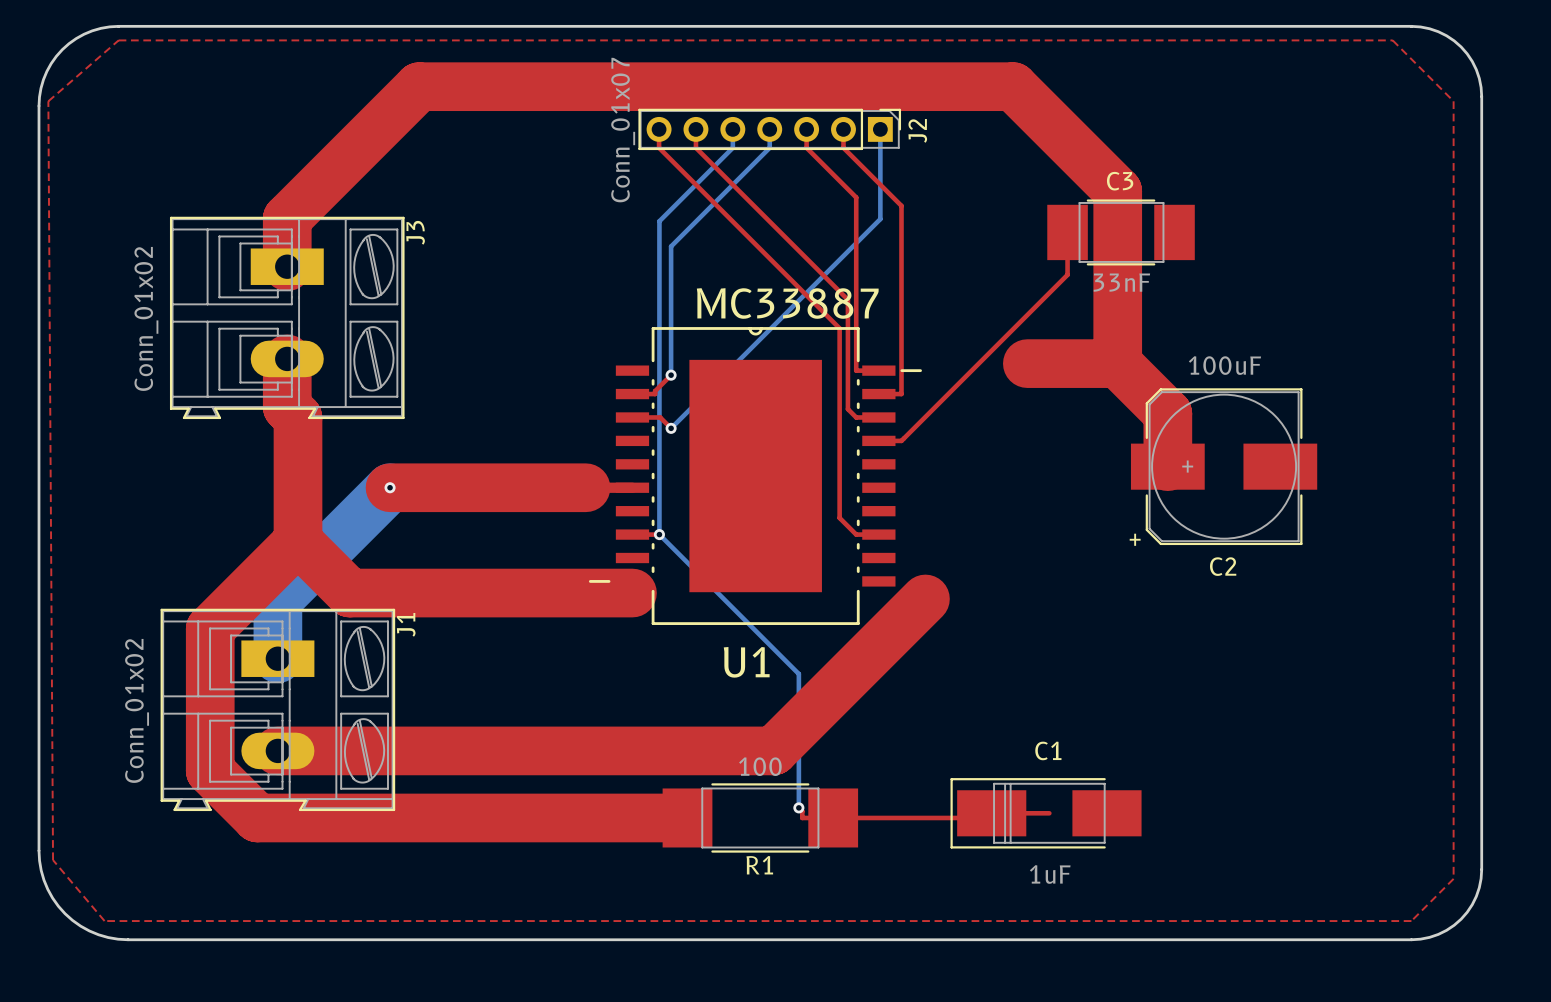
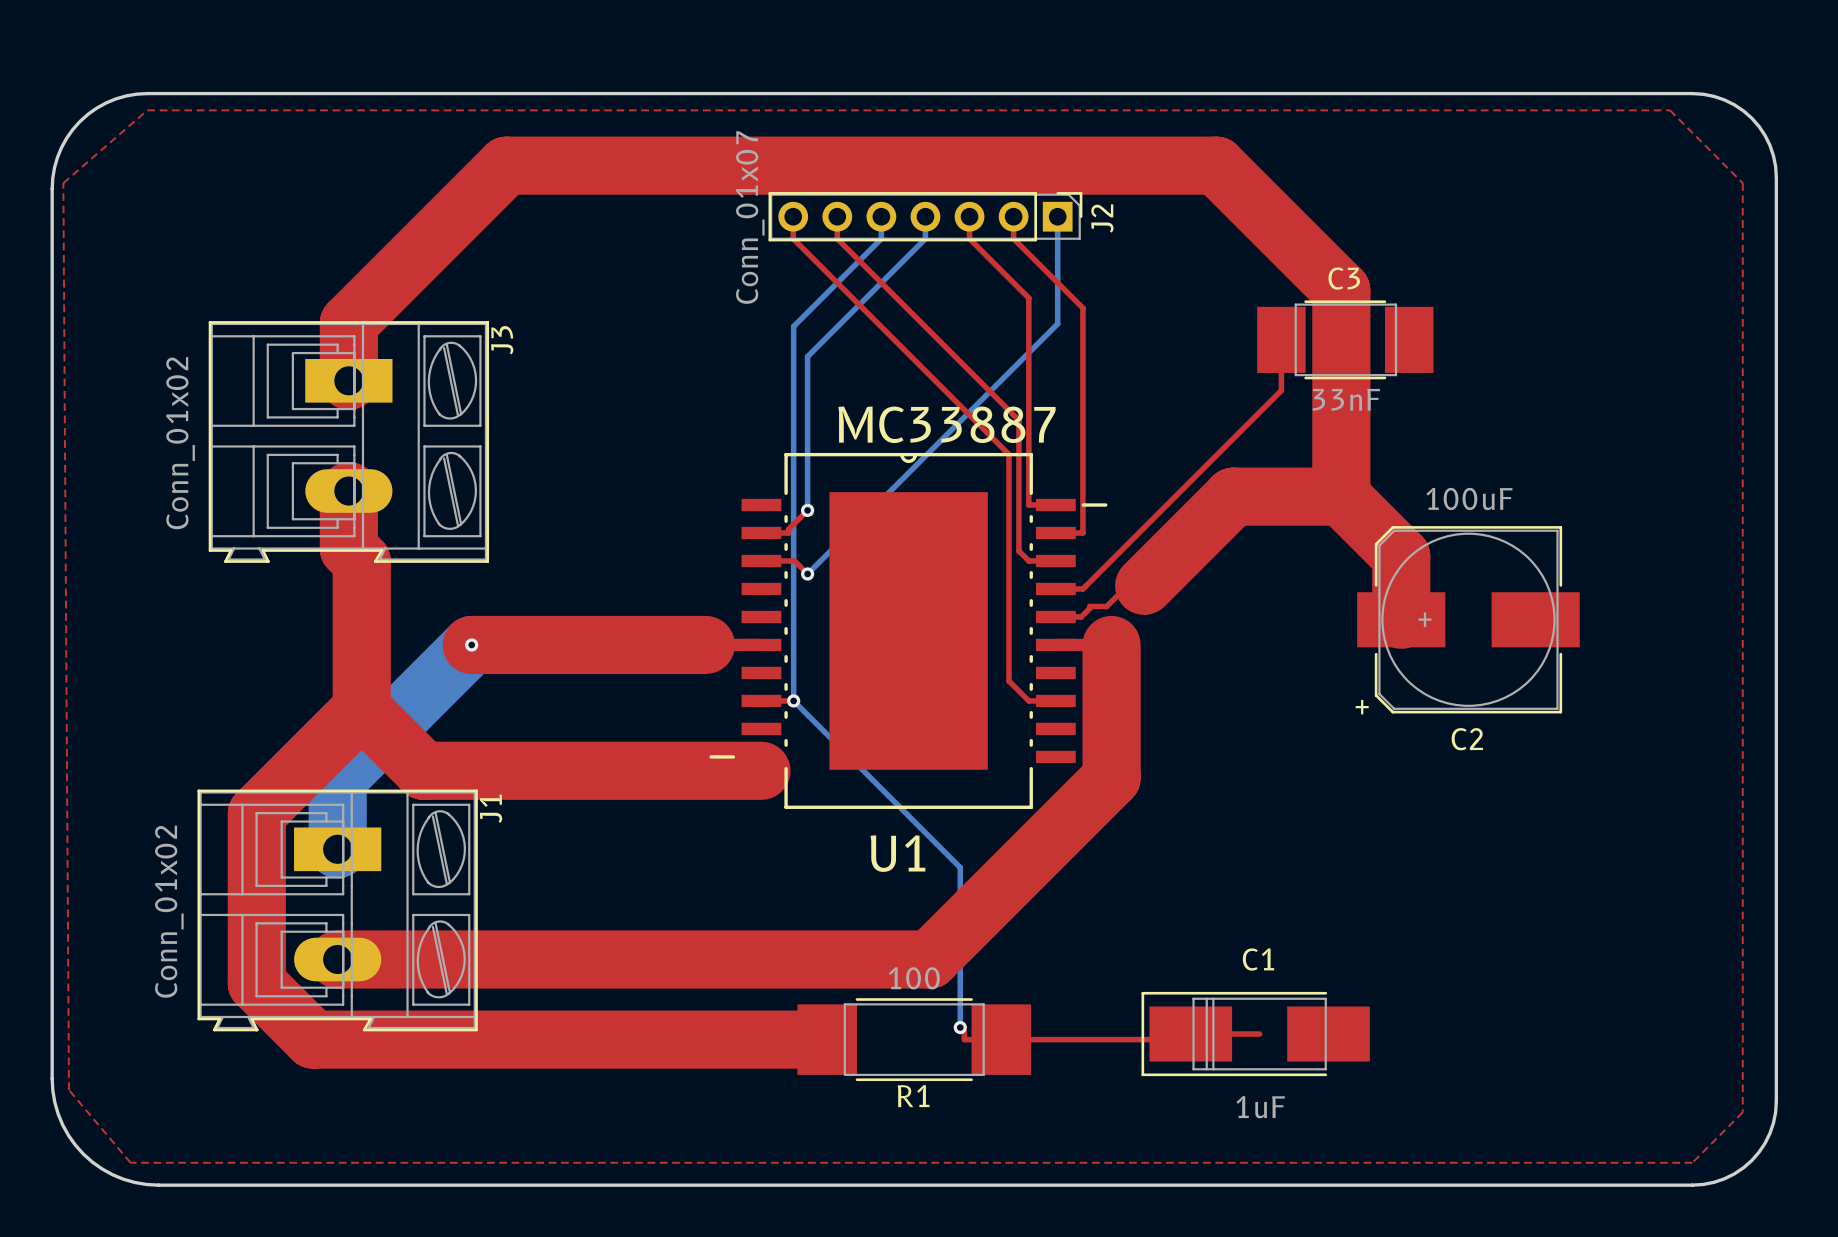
top track: none -> (1233, 496) (1144, 585) (1127, 585) (1106, 606) (1089, 606) (1081, 616) (1055, 616)
top track: none -> (1055, 644) (1111, 644) (1111, 777)

